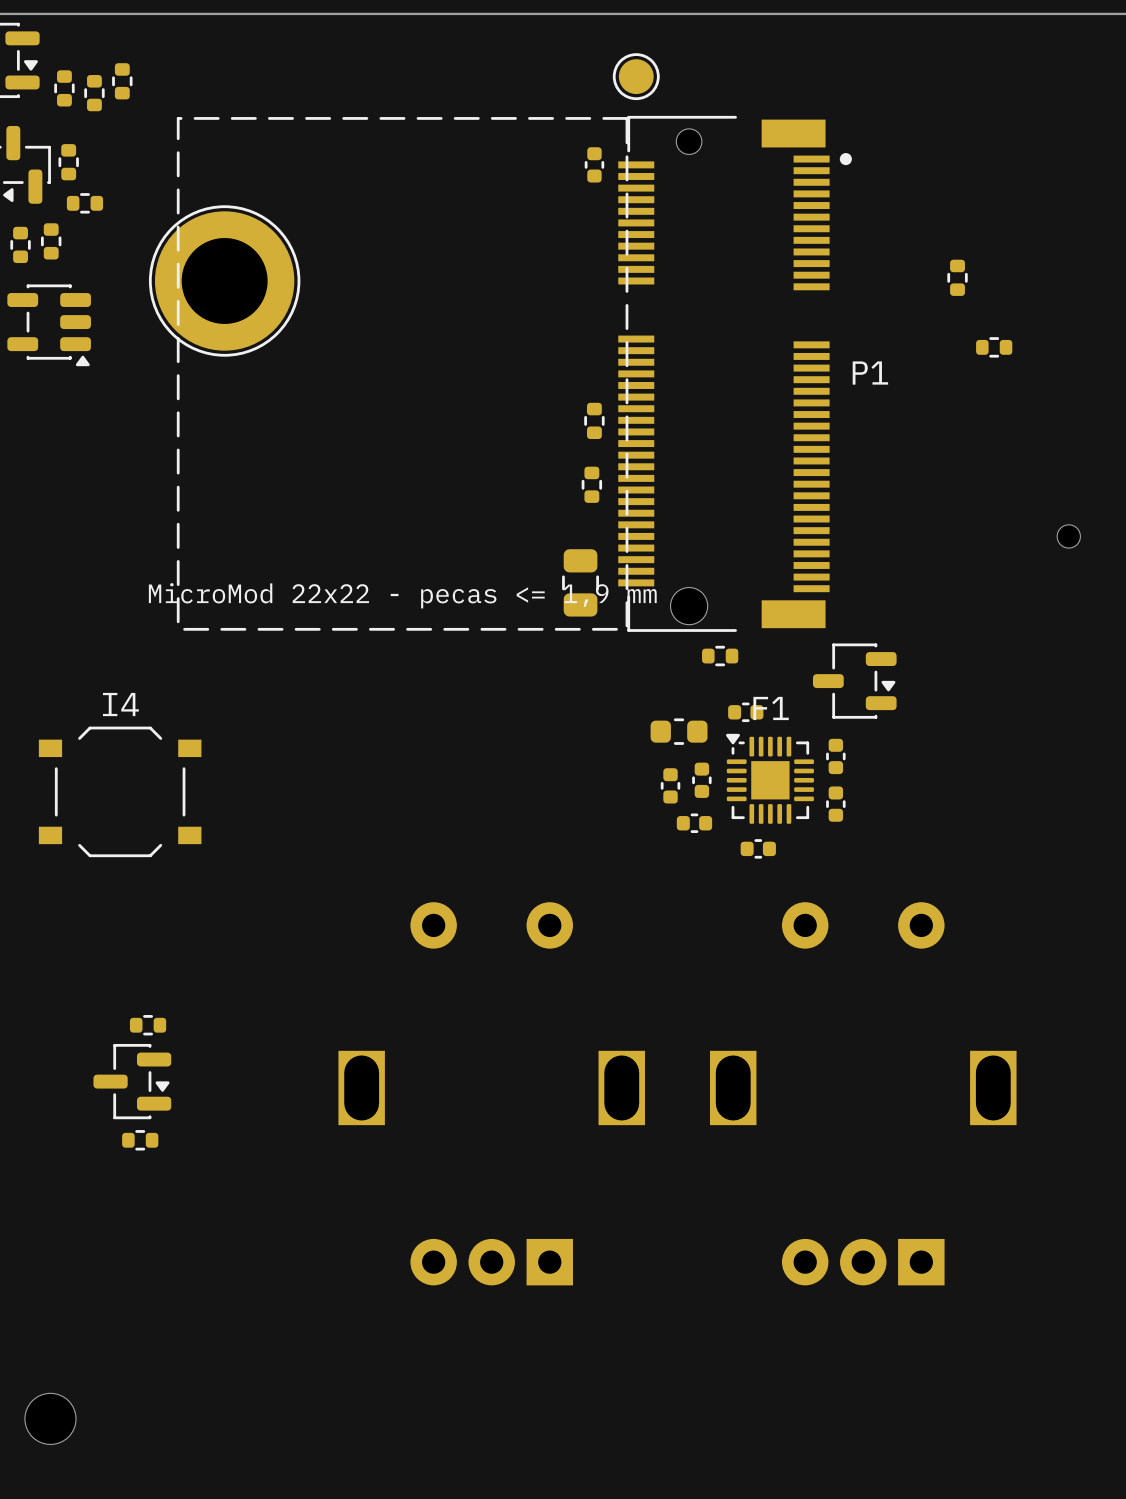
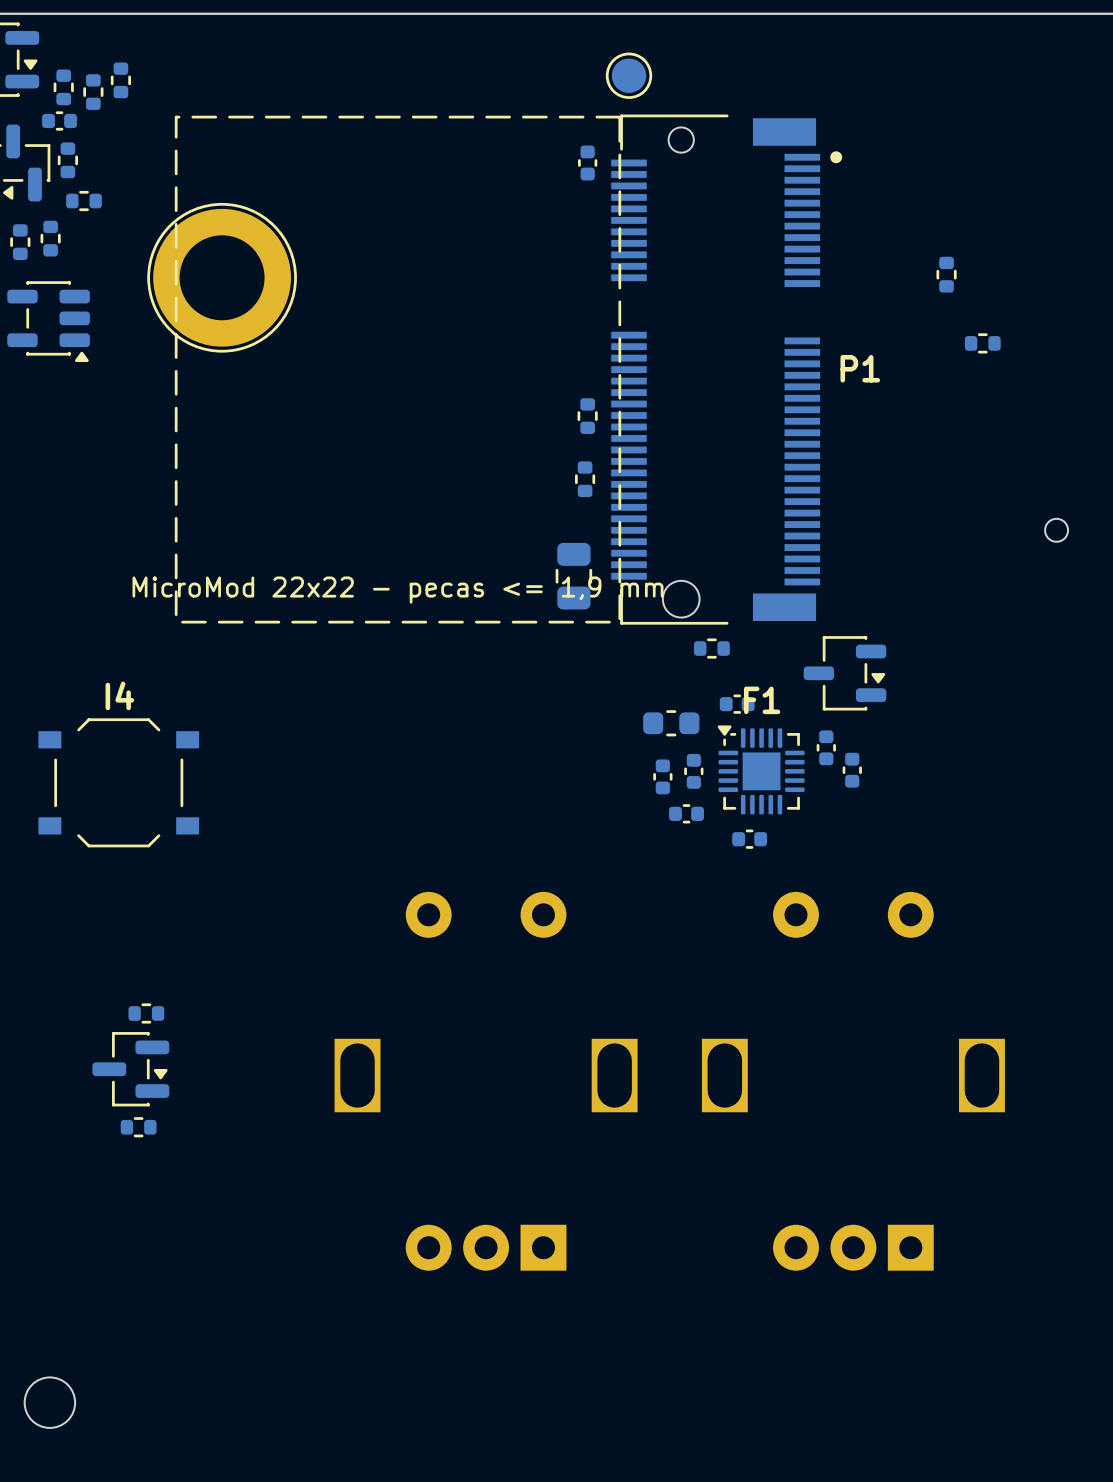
part: none -> (59, 120)
part position: (835, 804) -> (852, 770)

